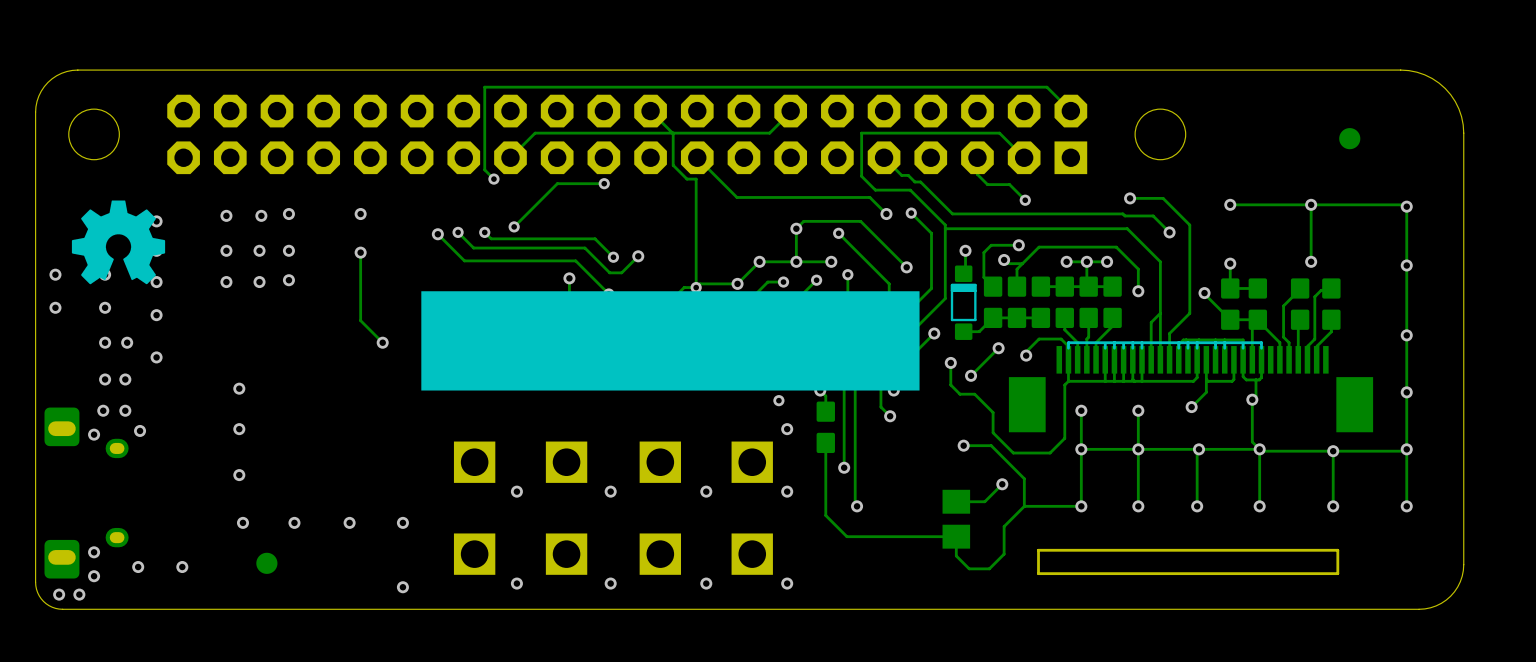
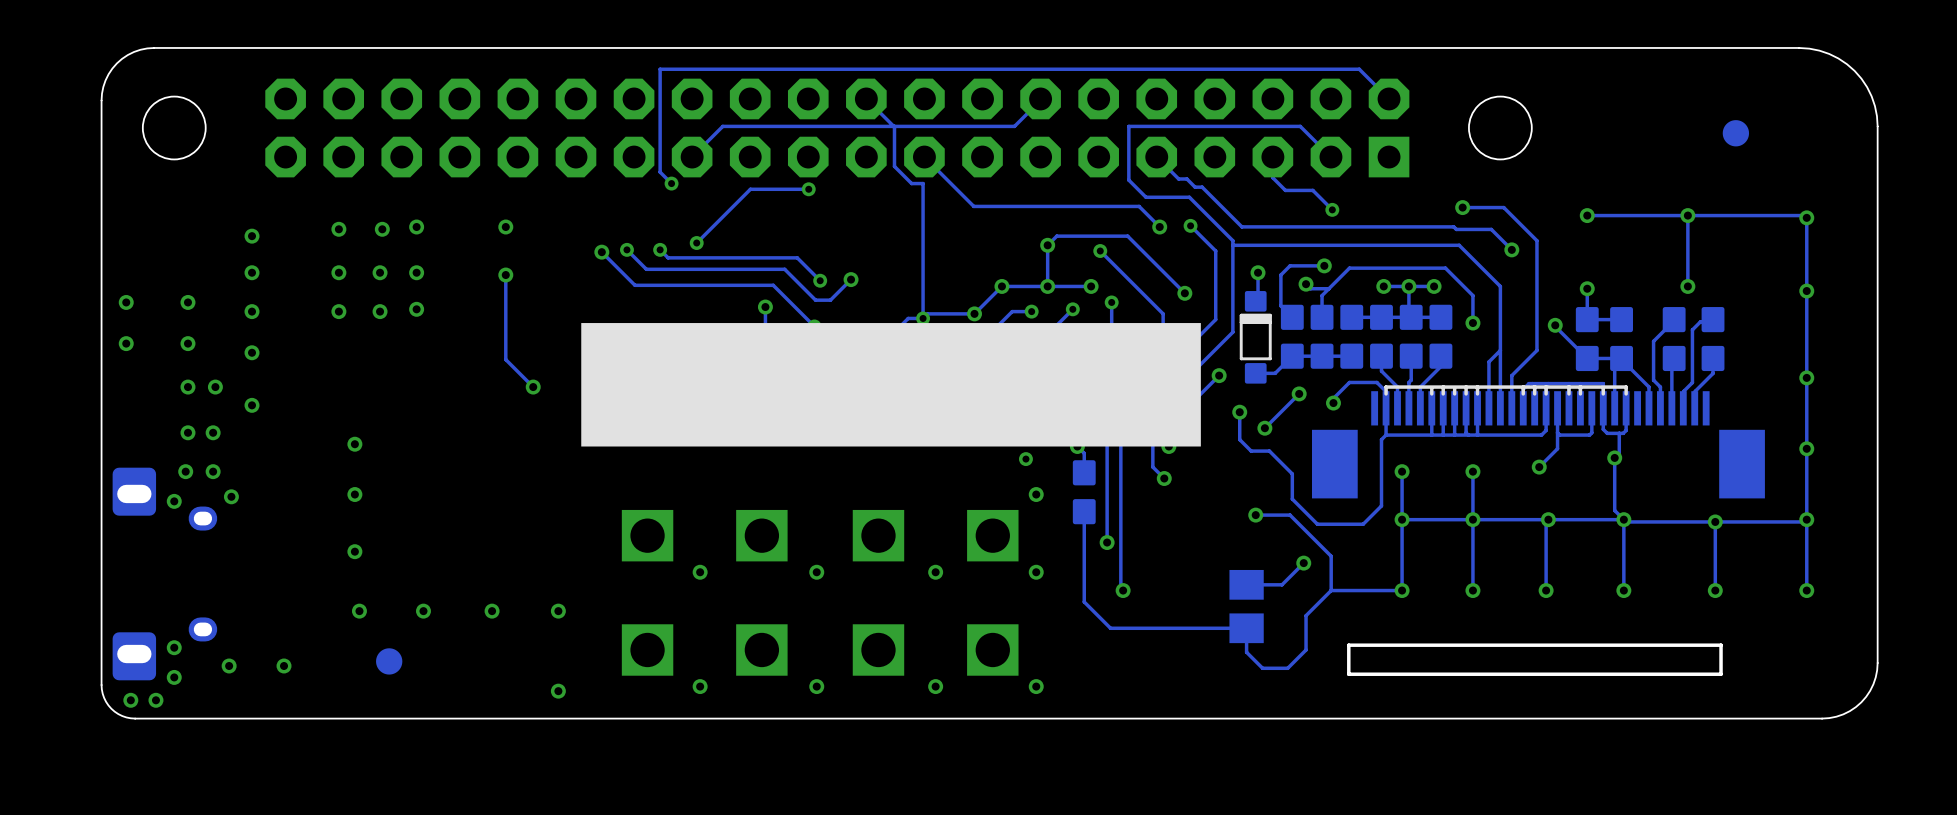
drawing: [71, 200, 166, 285] -> none

